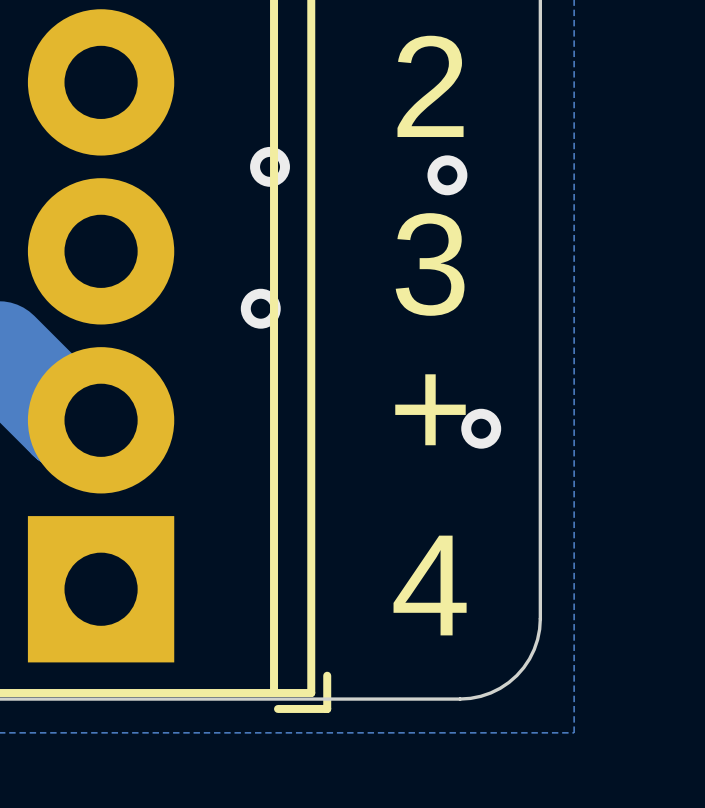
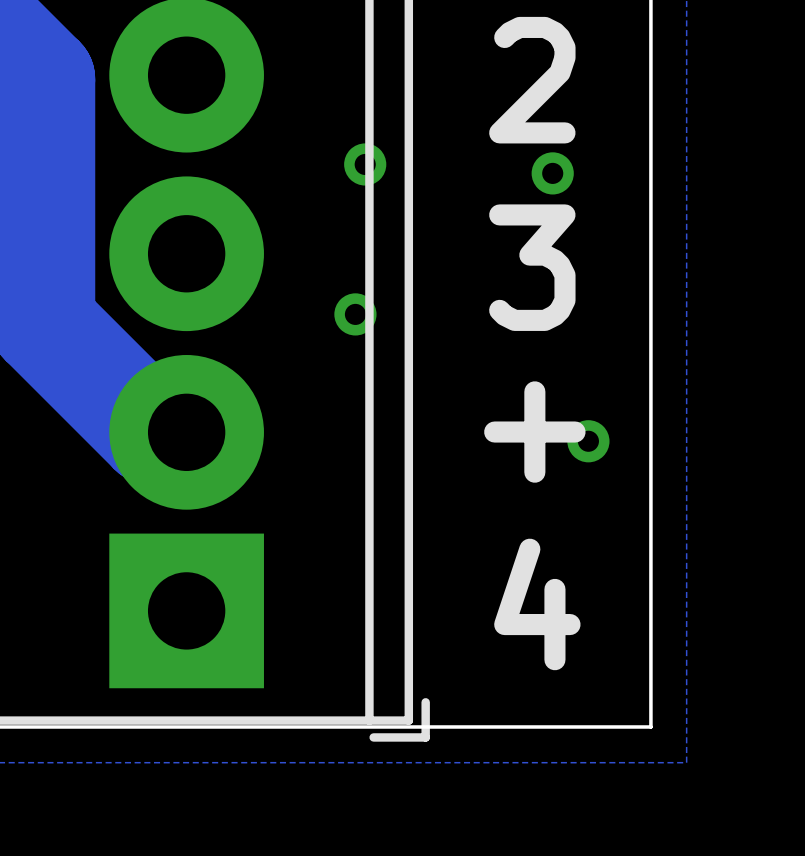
board edge: (540, 618) (534, 649) (516, 675) (490, 692) (460, 699) -> (650, 642) (650, 726) (566, 726)

